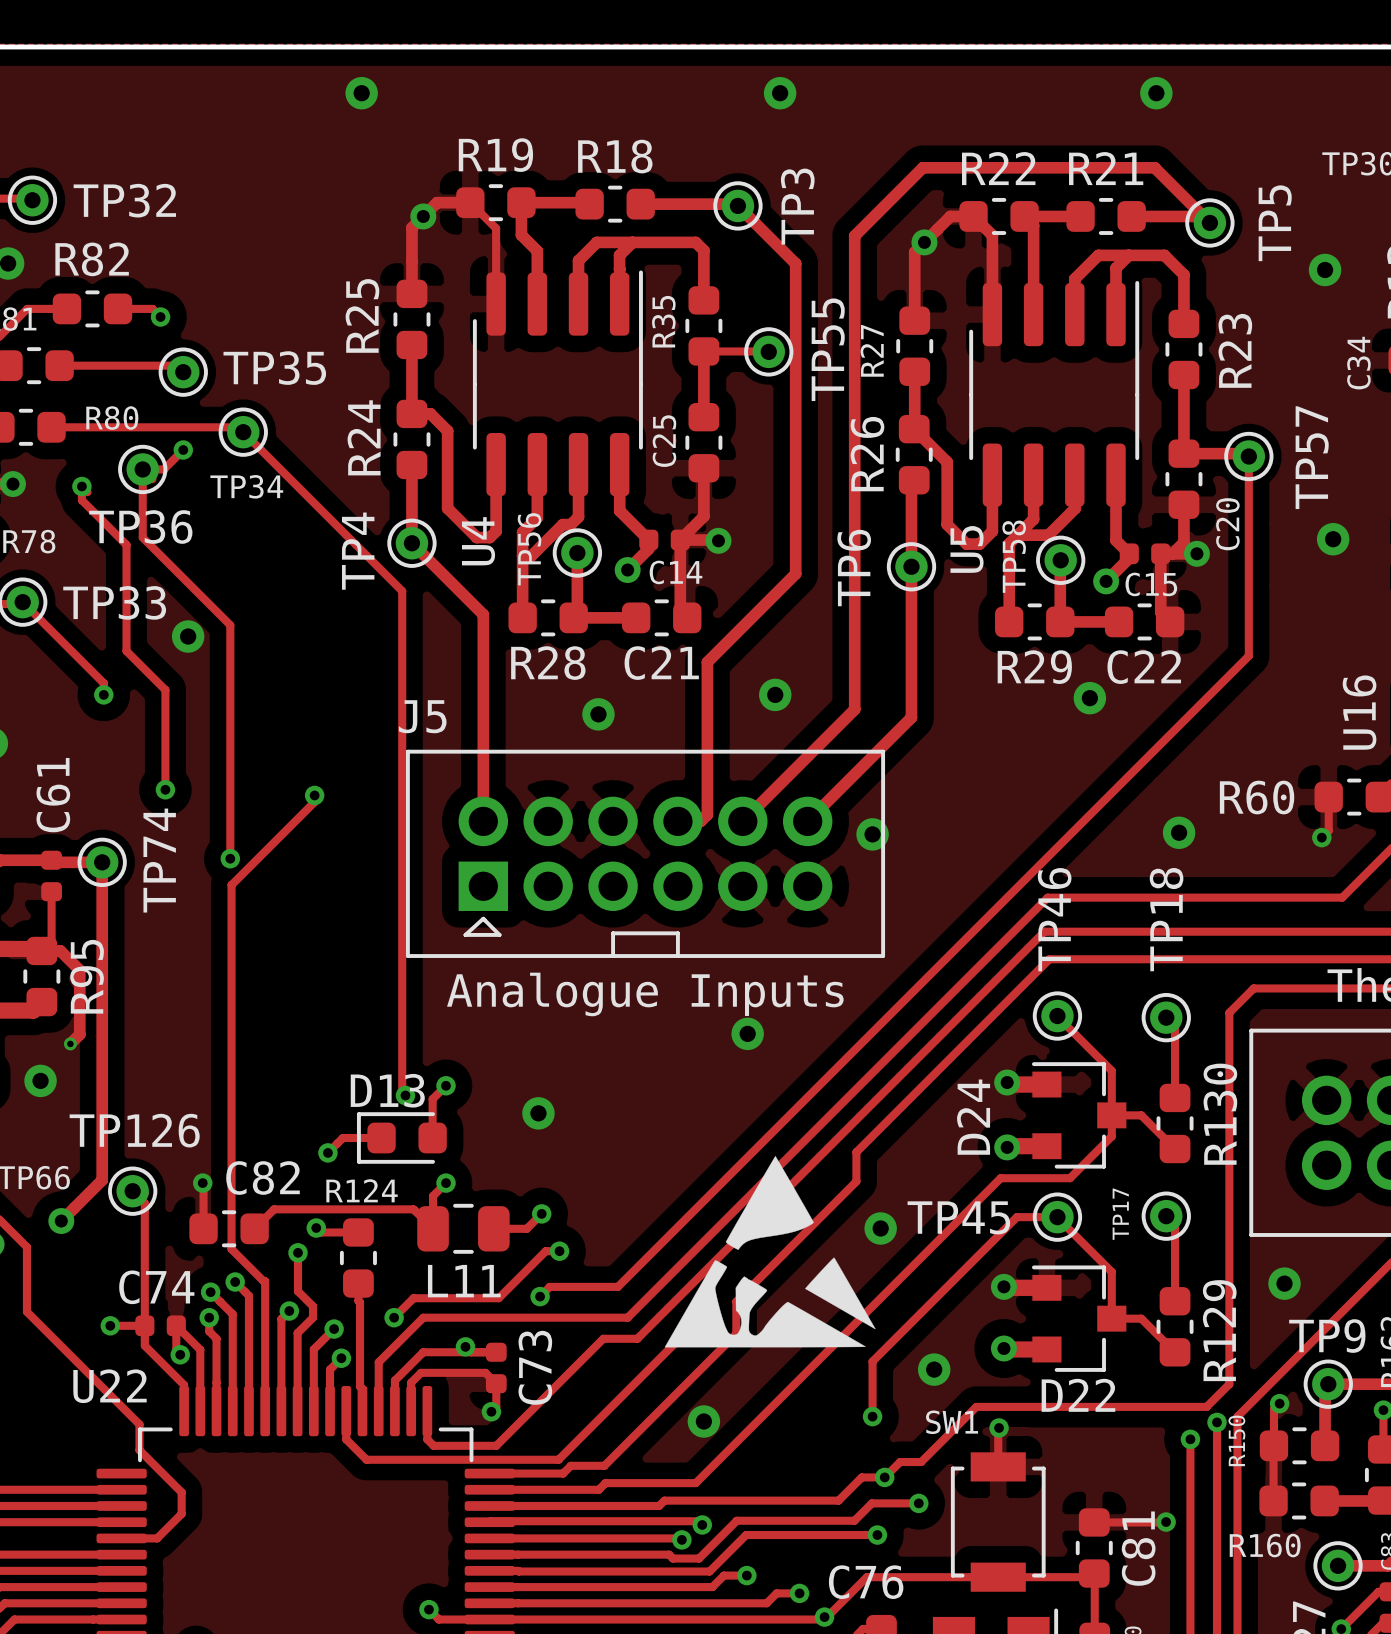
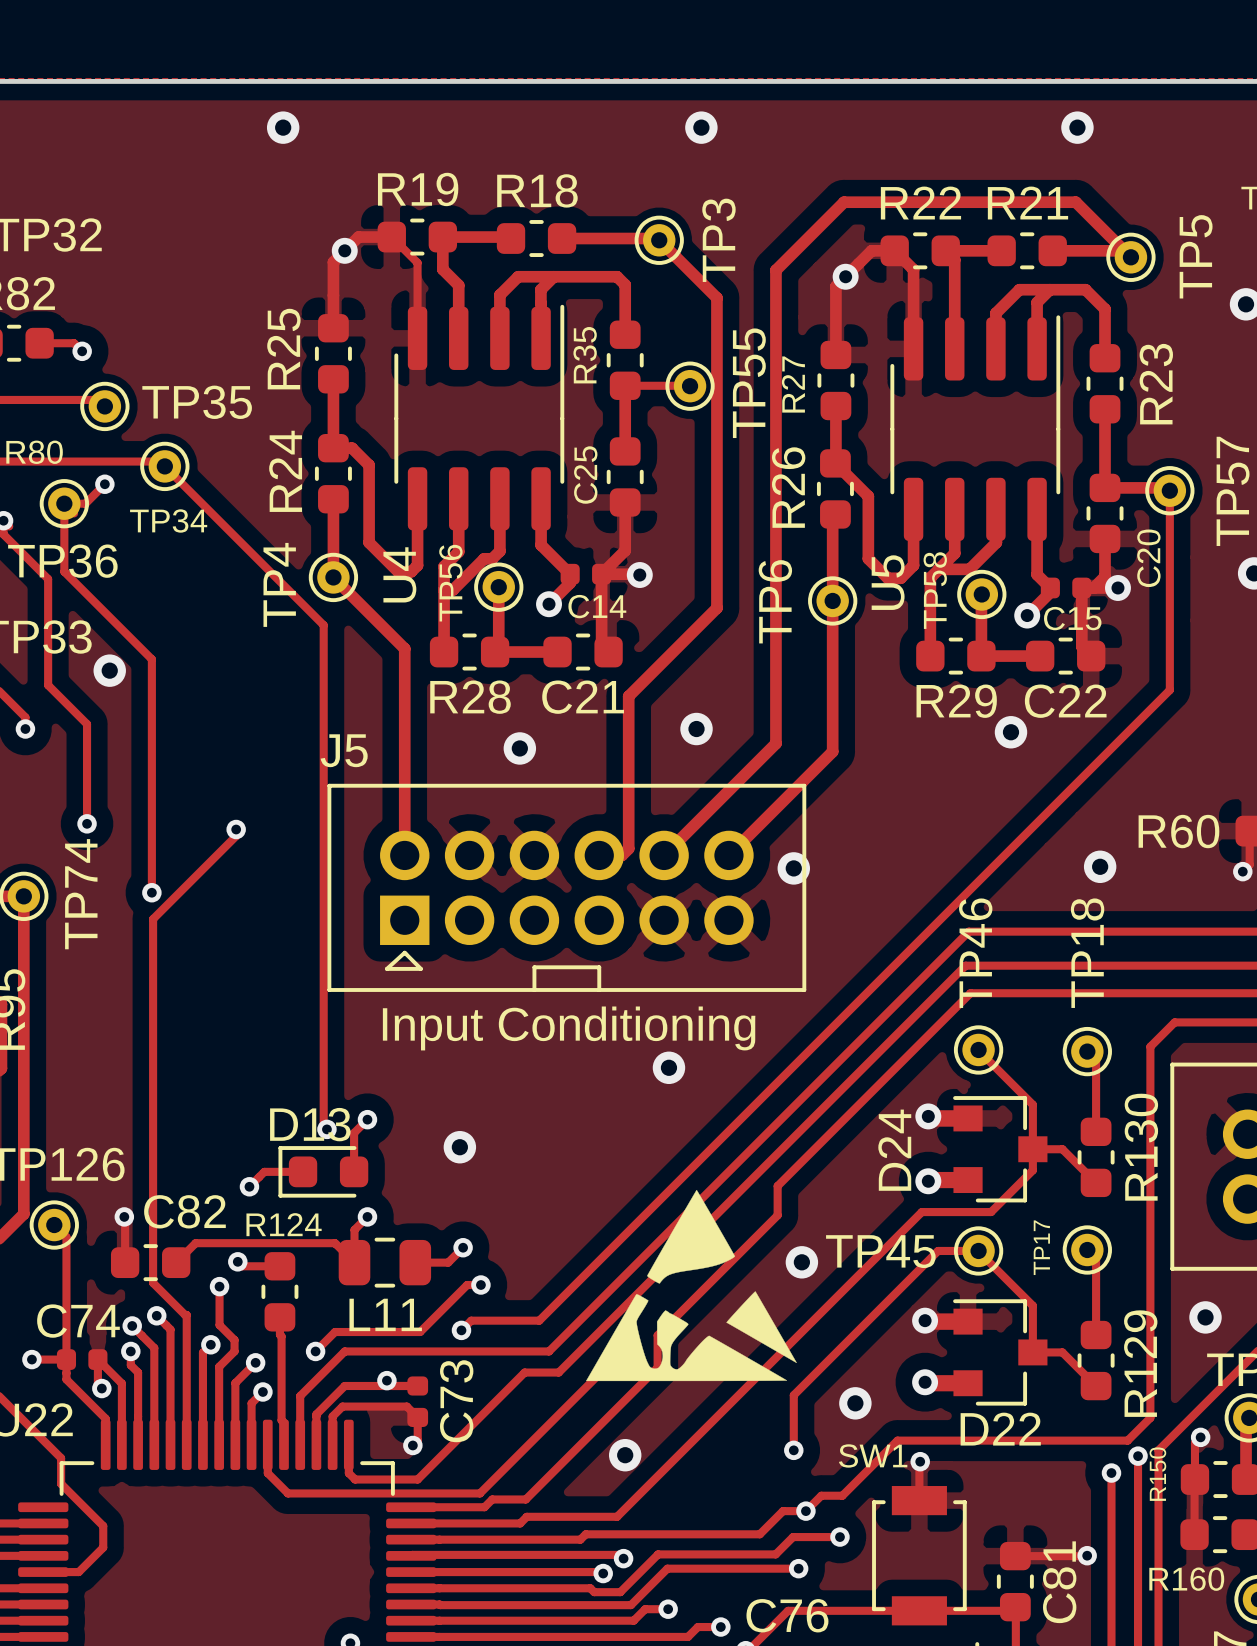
text: Analogue Inputs (645, 994) -> Input Conditioning (569, 1028)

